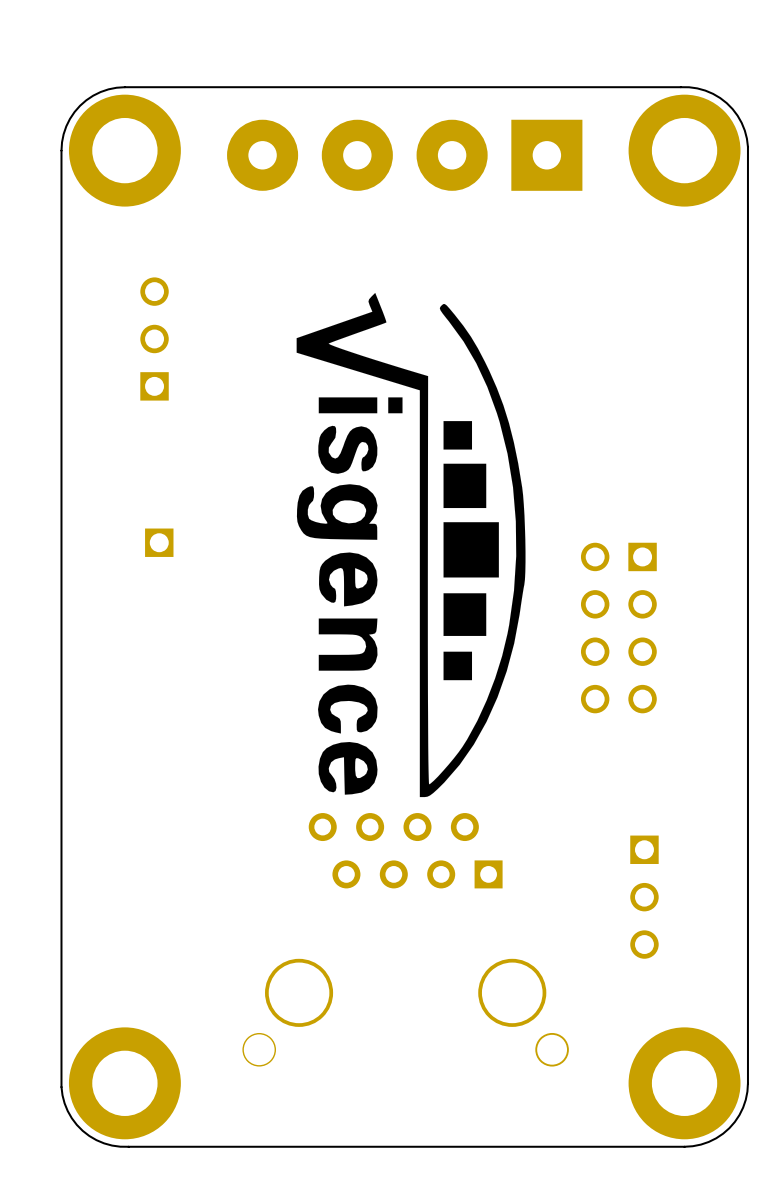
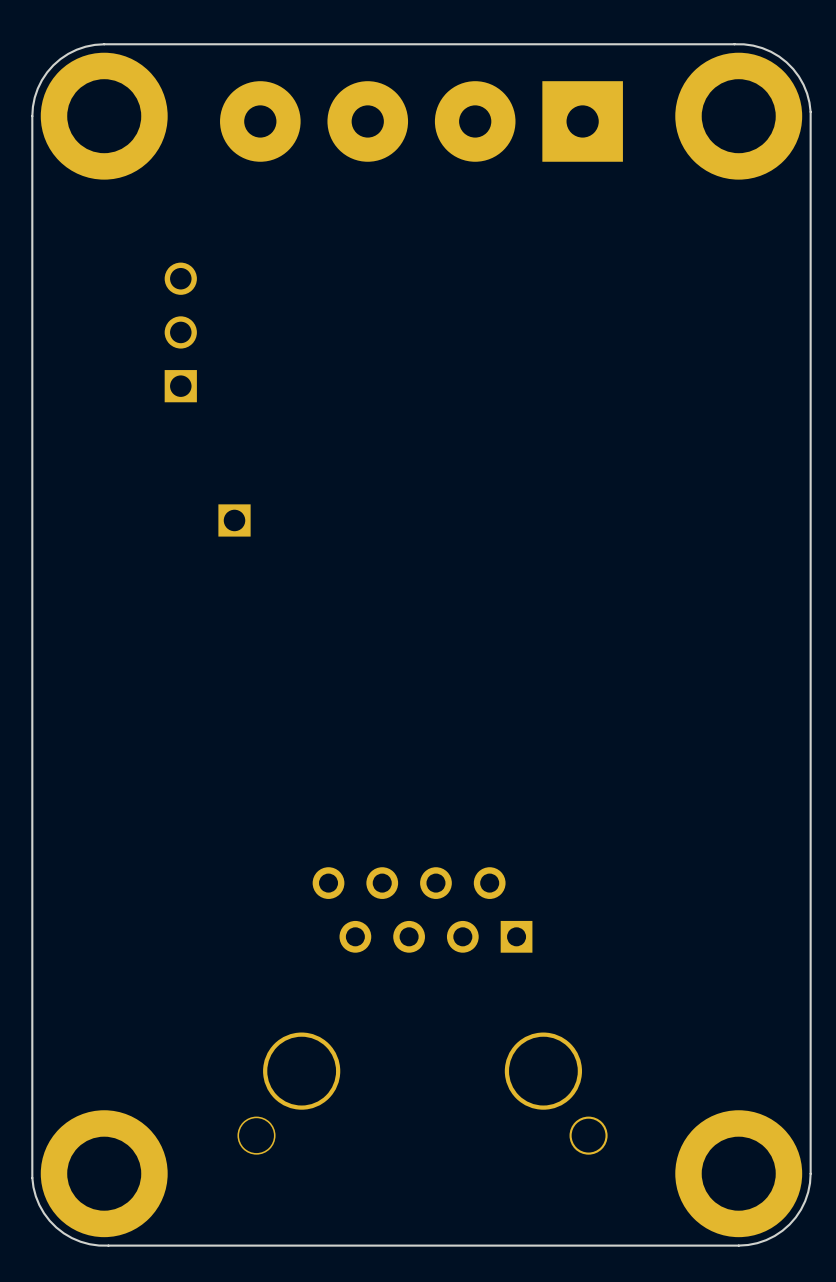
drawing: [296, 292, 526, 798] -> none
part position: (154, 338) -> (180, 332)
part position: (159, 542) -> (234, 520)
part: (618, 628) -> none
part: (644, 897) -> none

